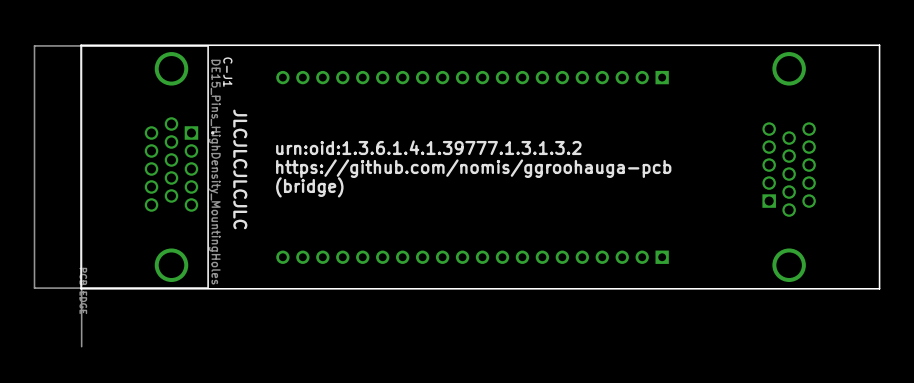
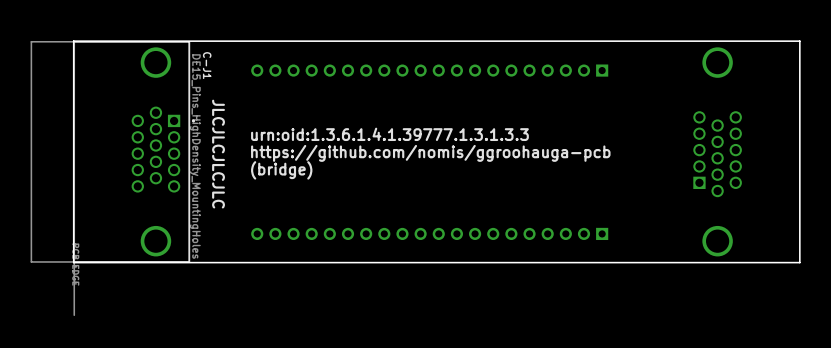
text: urn:oid:1.3.6.1.4.1.39777.1.3.1.3.2 (428, 147) -> urn:oid:1.3.6.1.4.1.39777.1.3.1.3.3 (389, 134)

